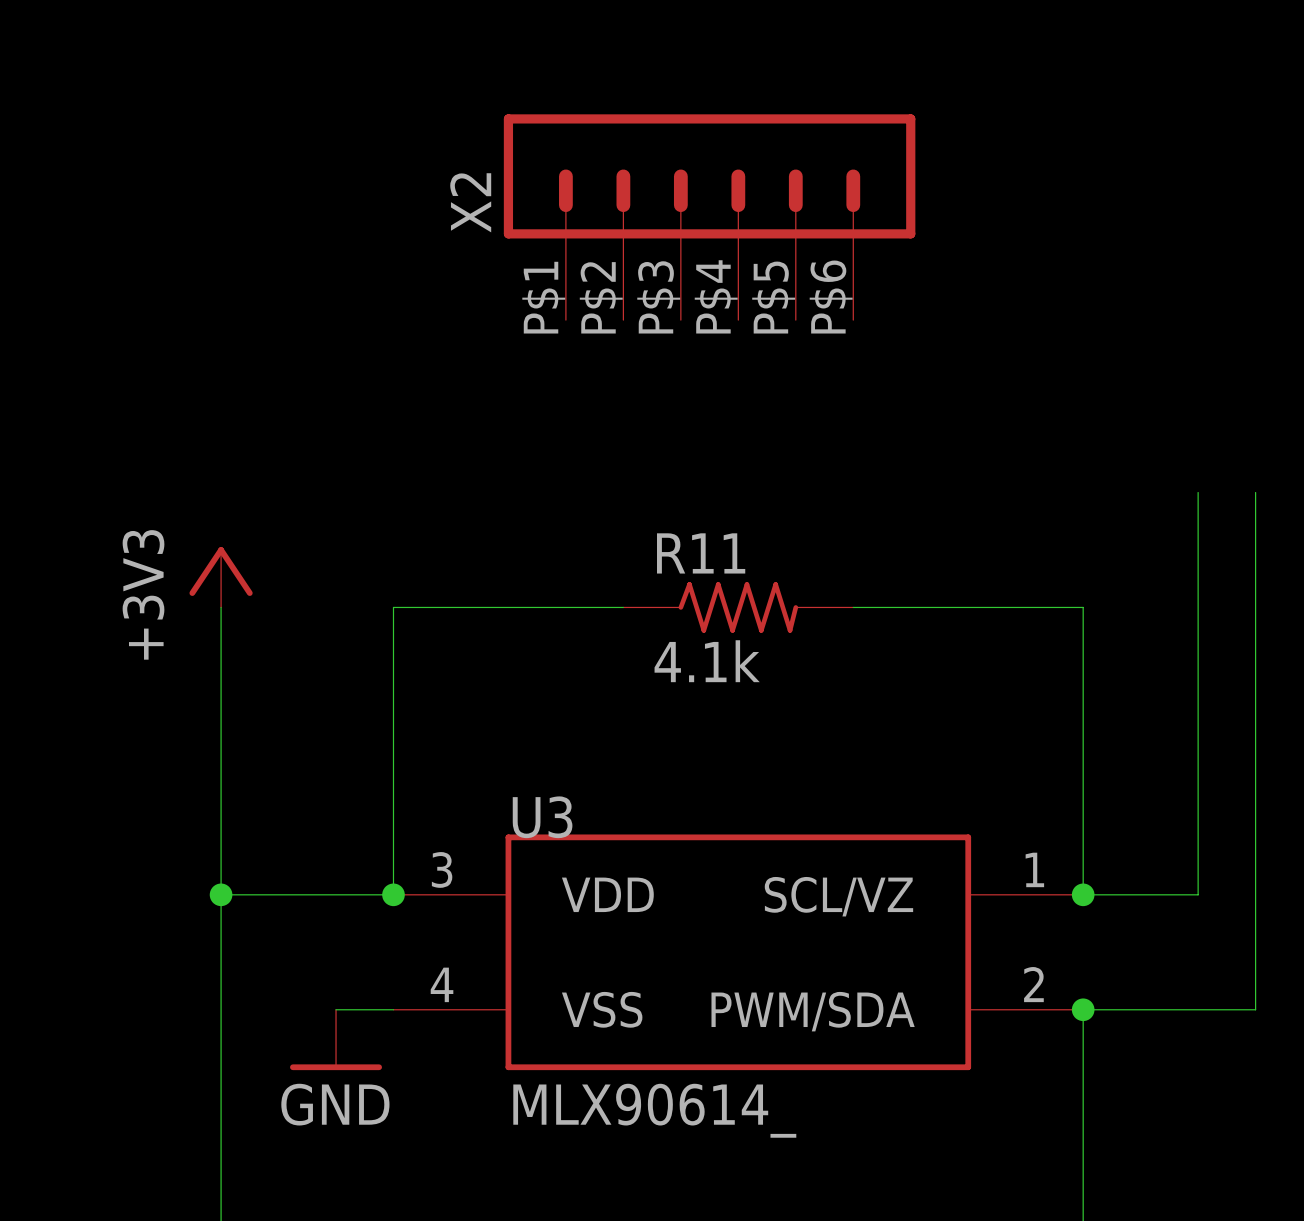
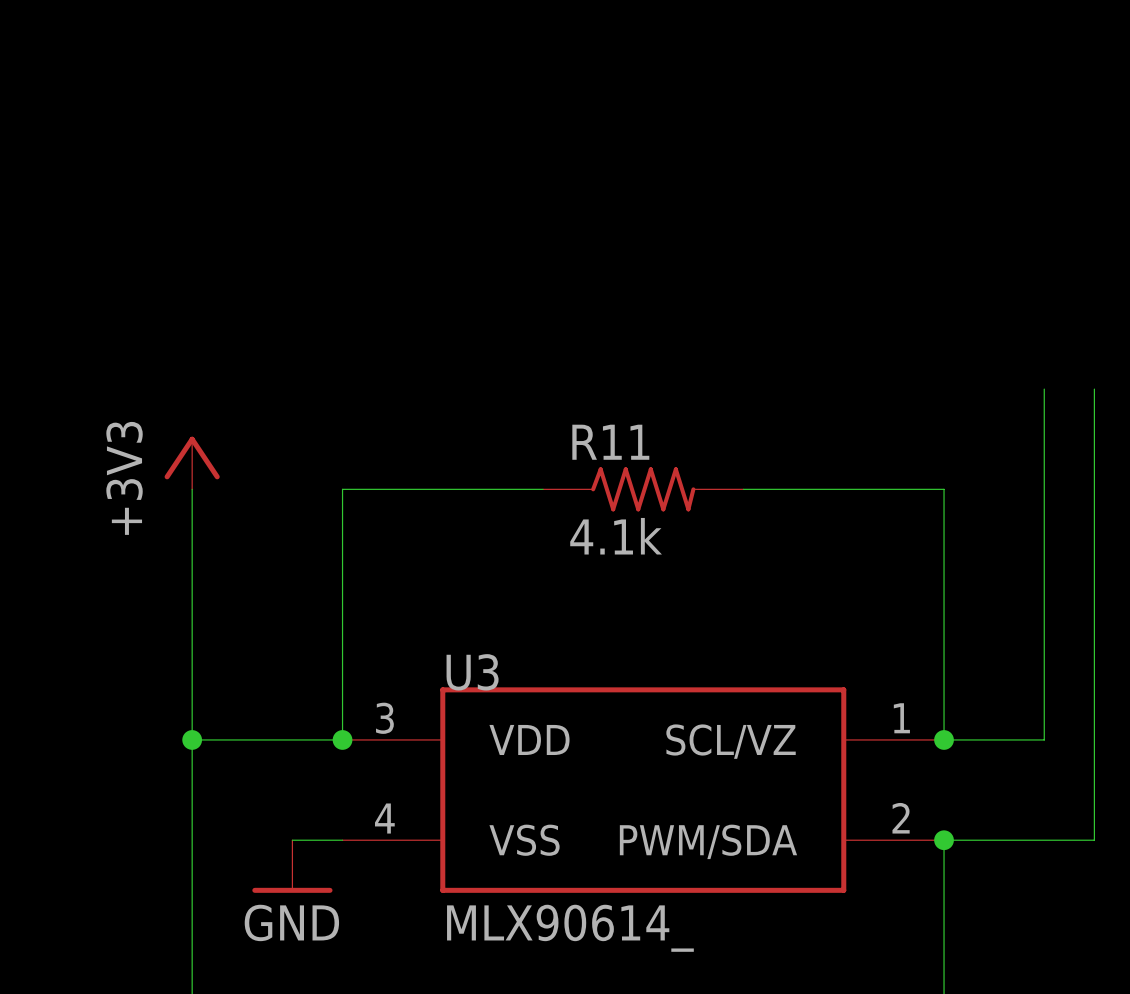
X2: (709, 217) -> none

